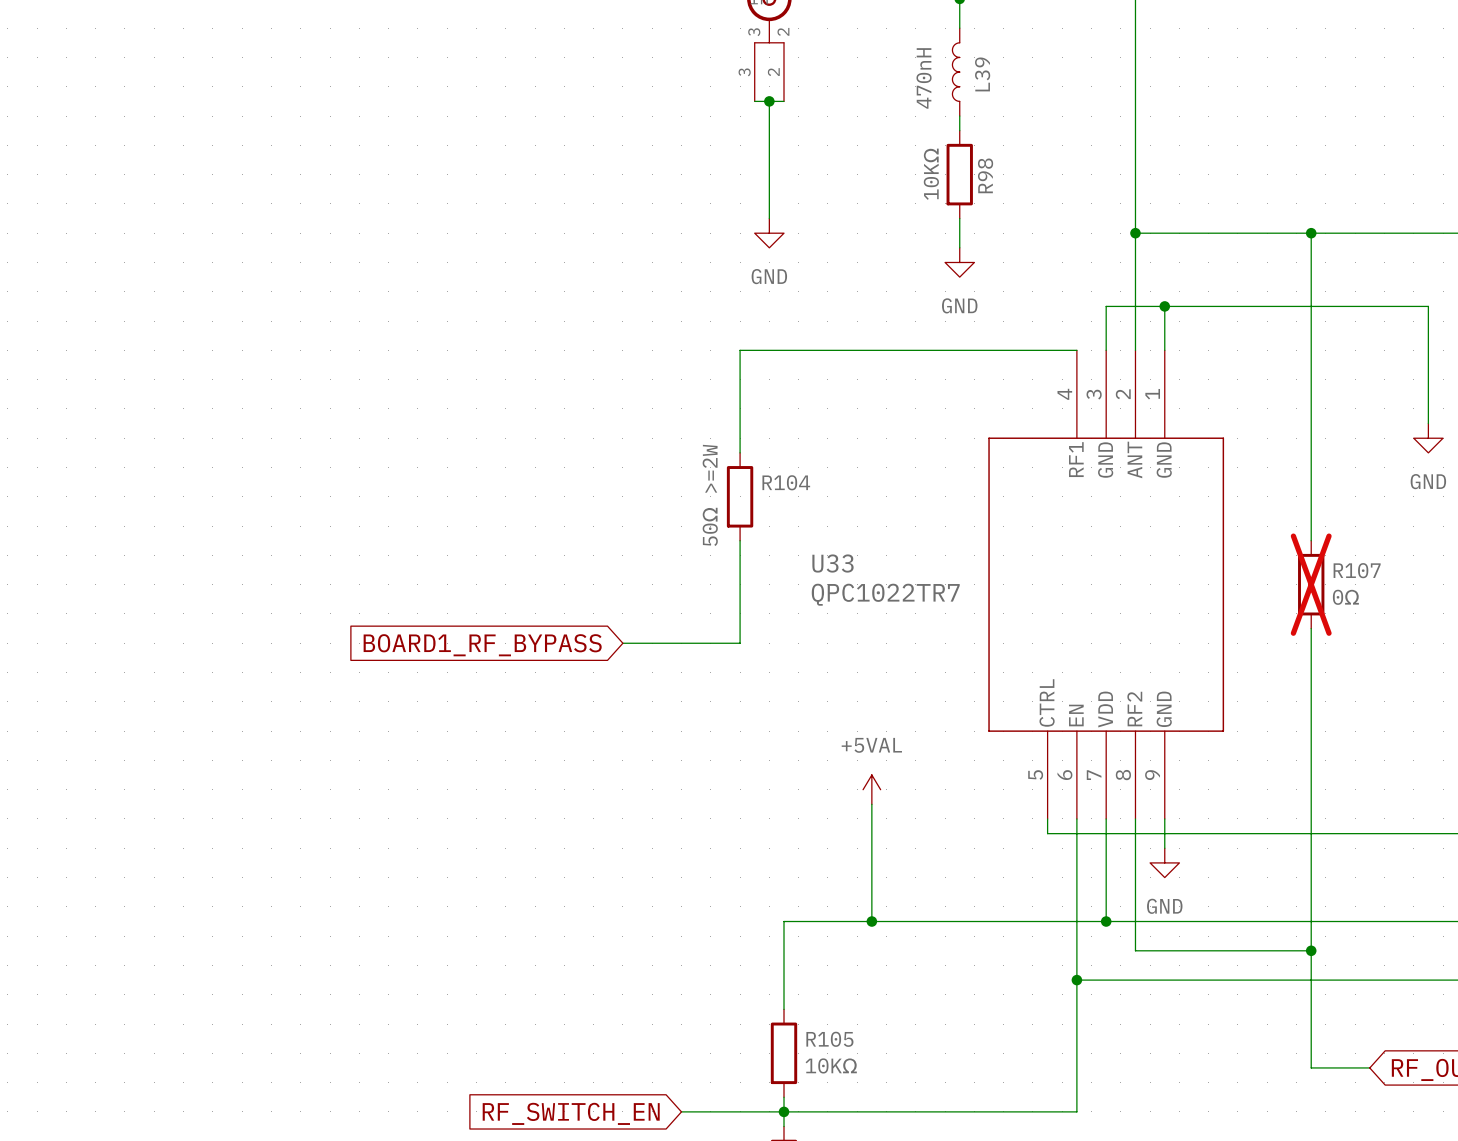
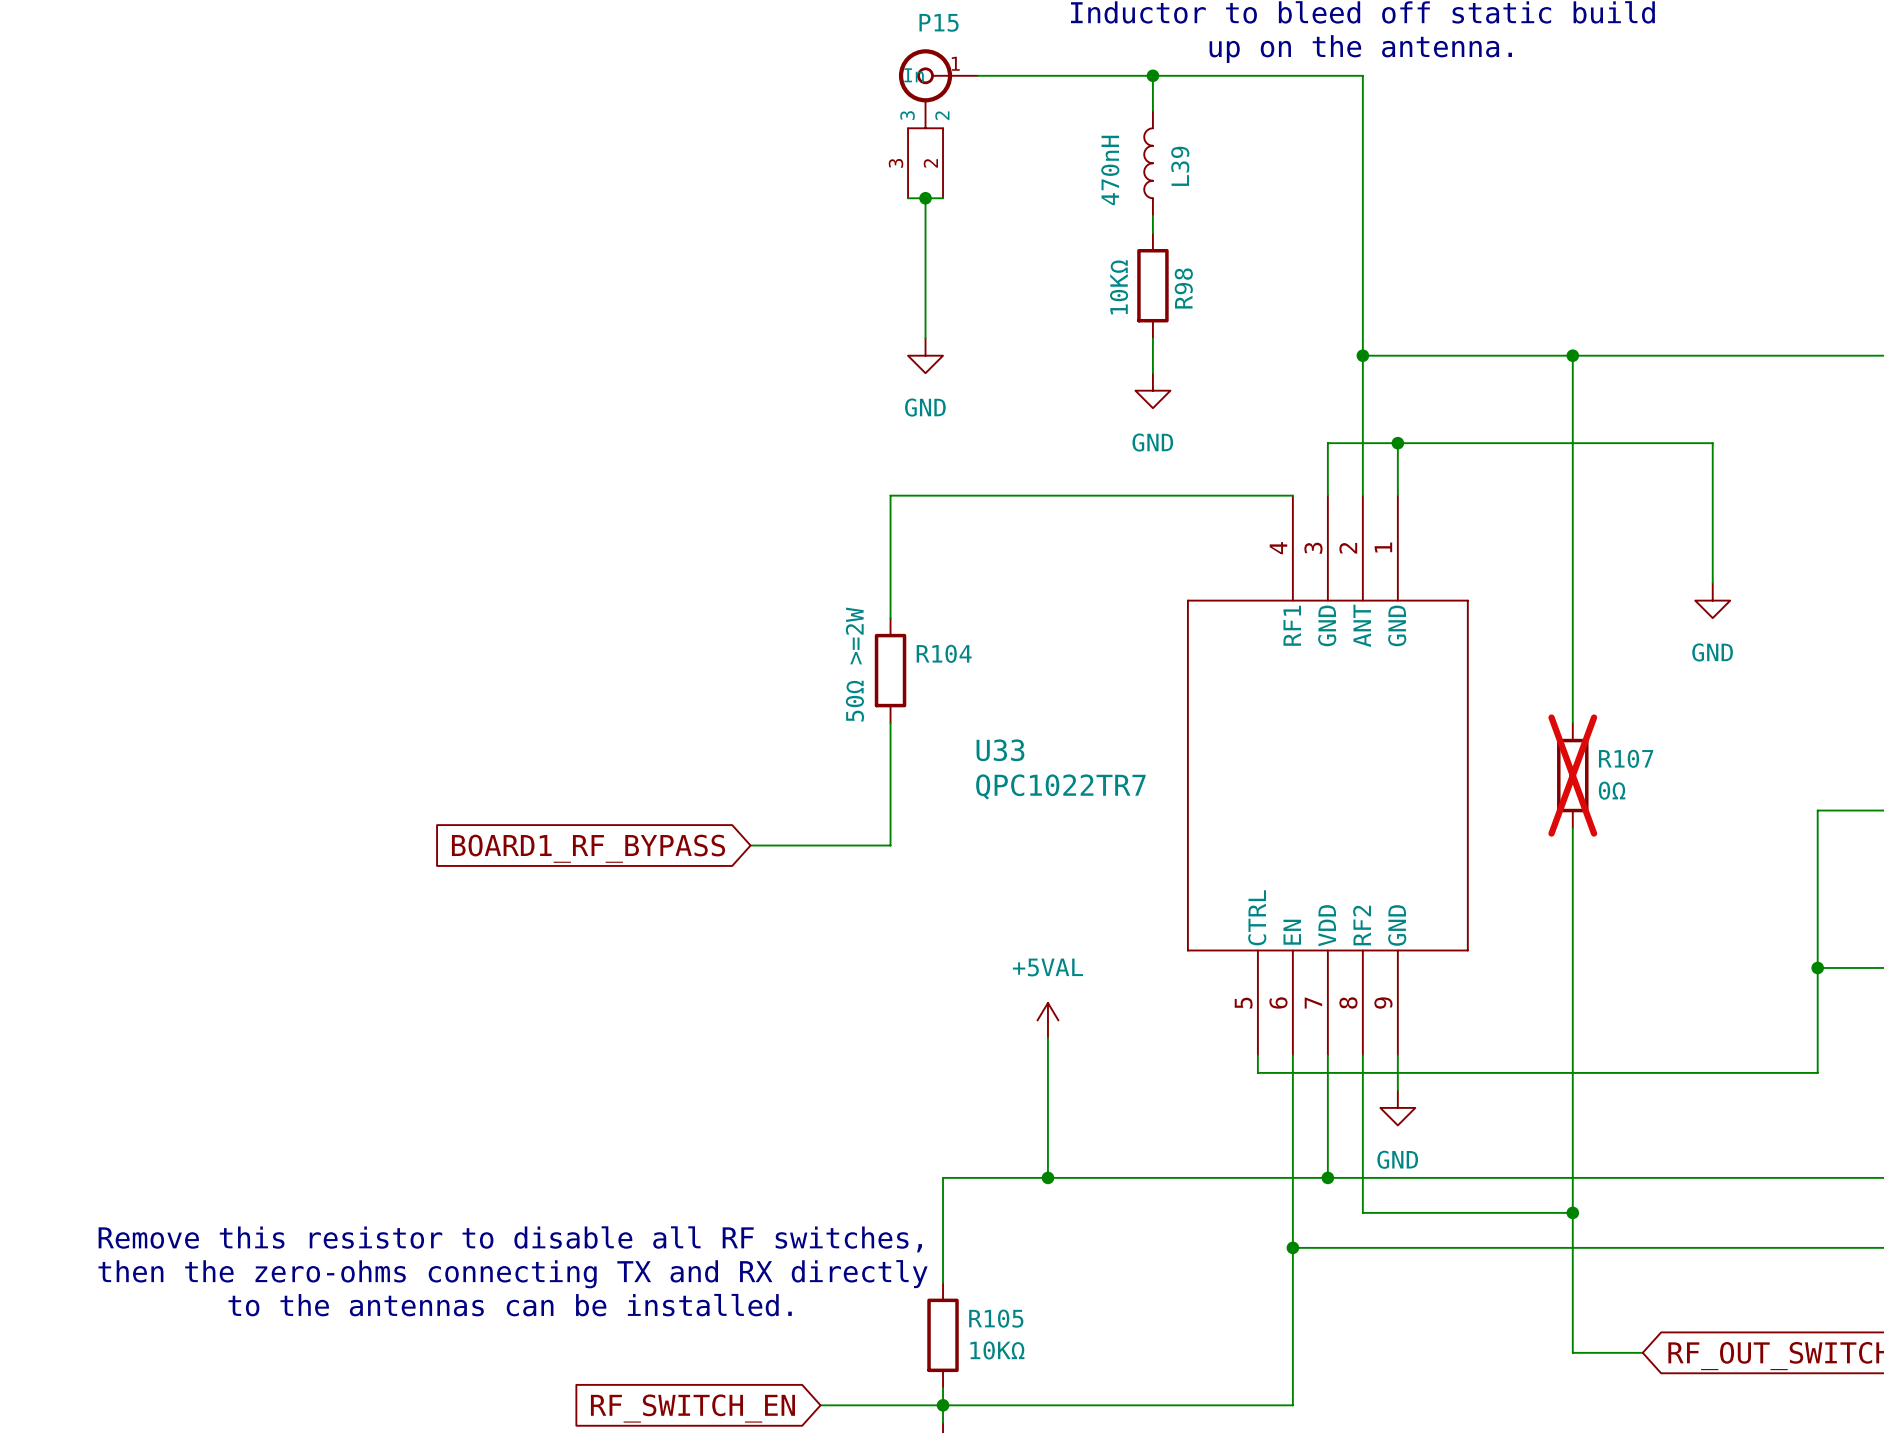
text: none -> Remove this resistor to disable all RF switches, (510, 1239)
text: none -> then the zero-ohms connecting TX and RX directly (513, 1274)
text: none -> to the antennas can be installed. (510, 1305)

